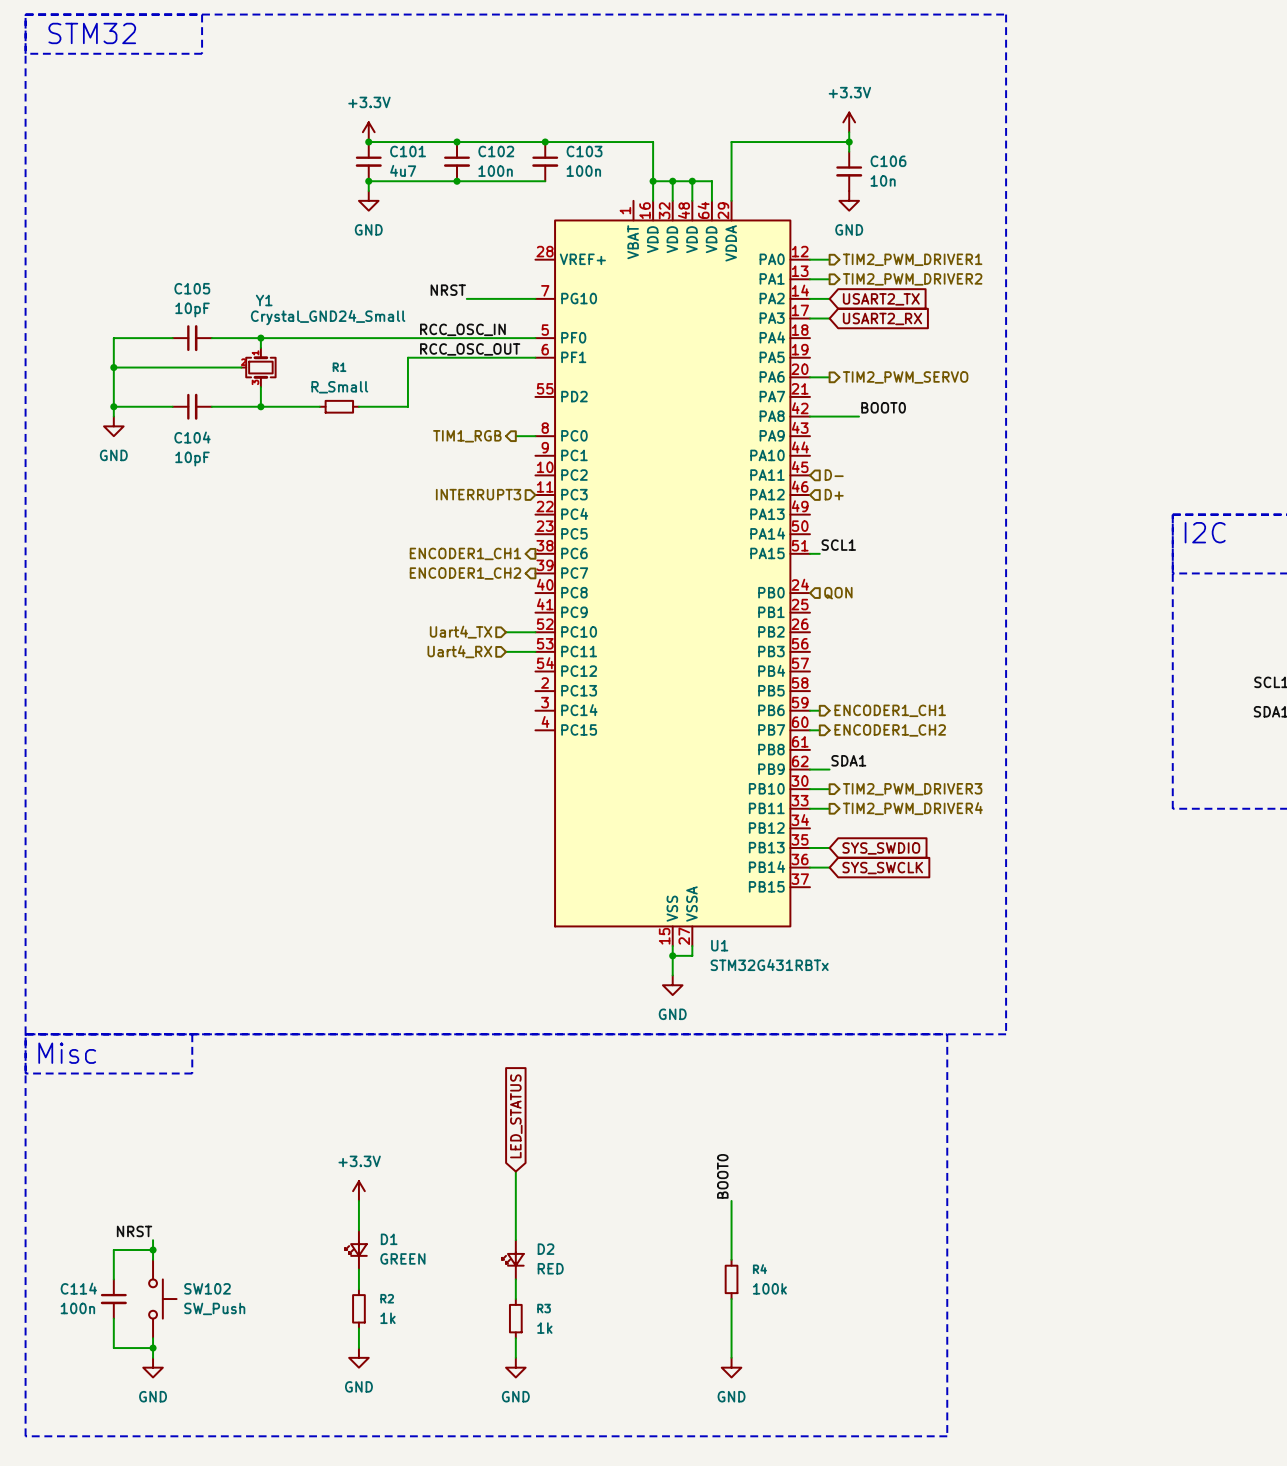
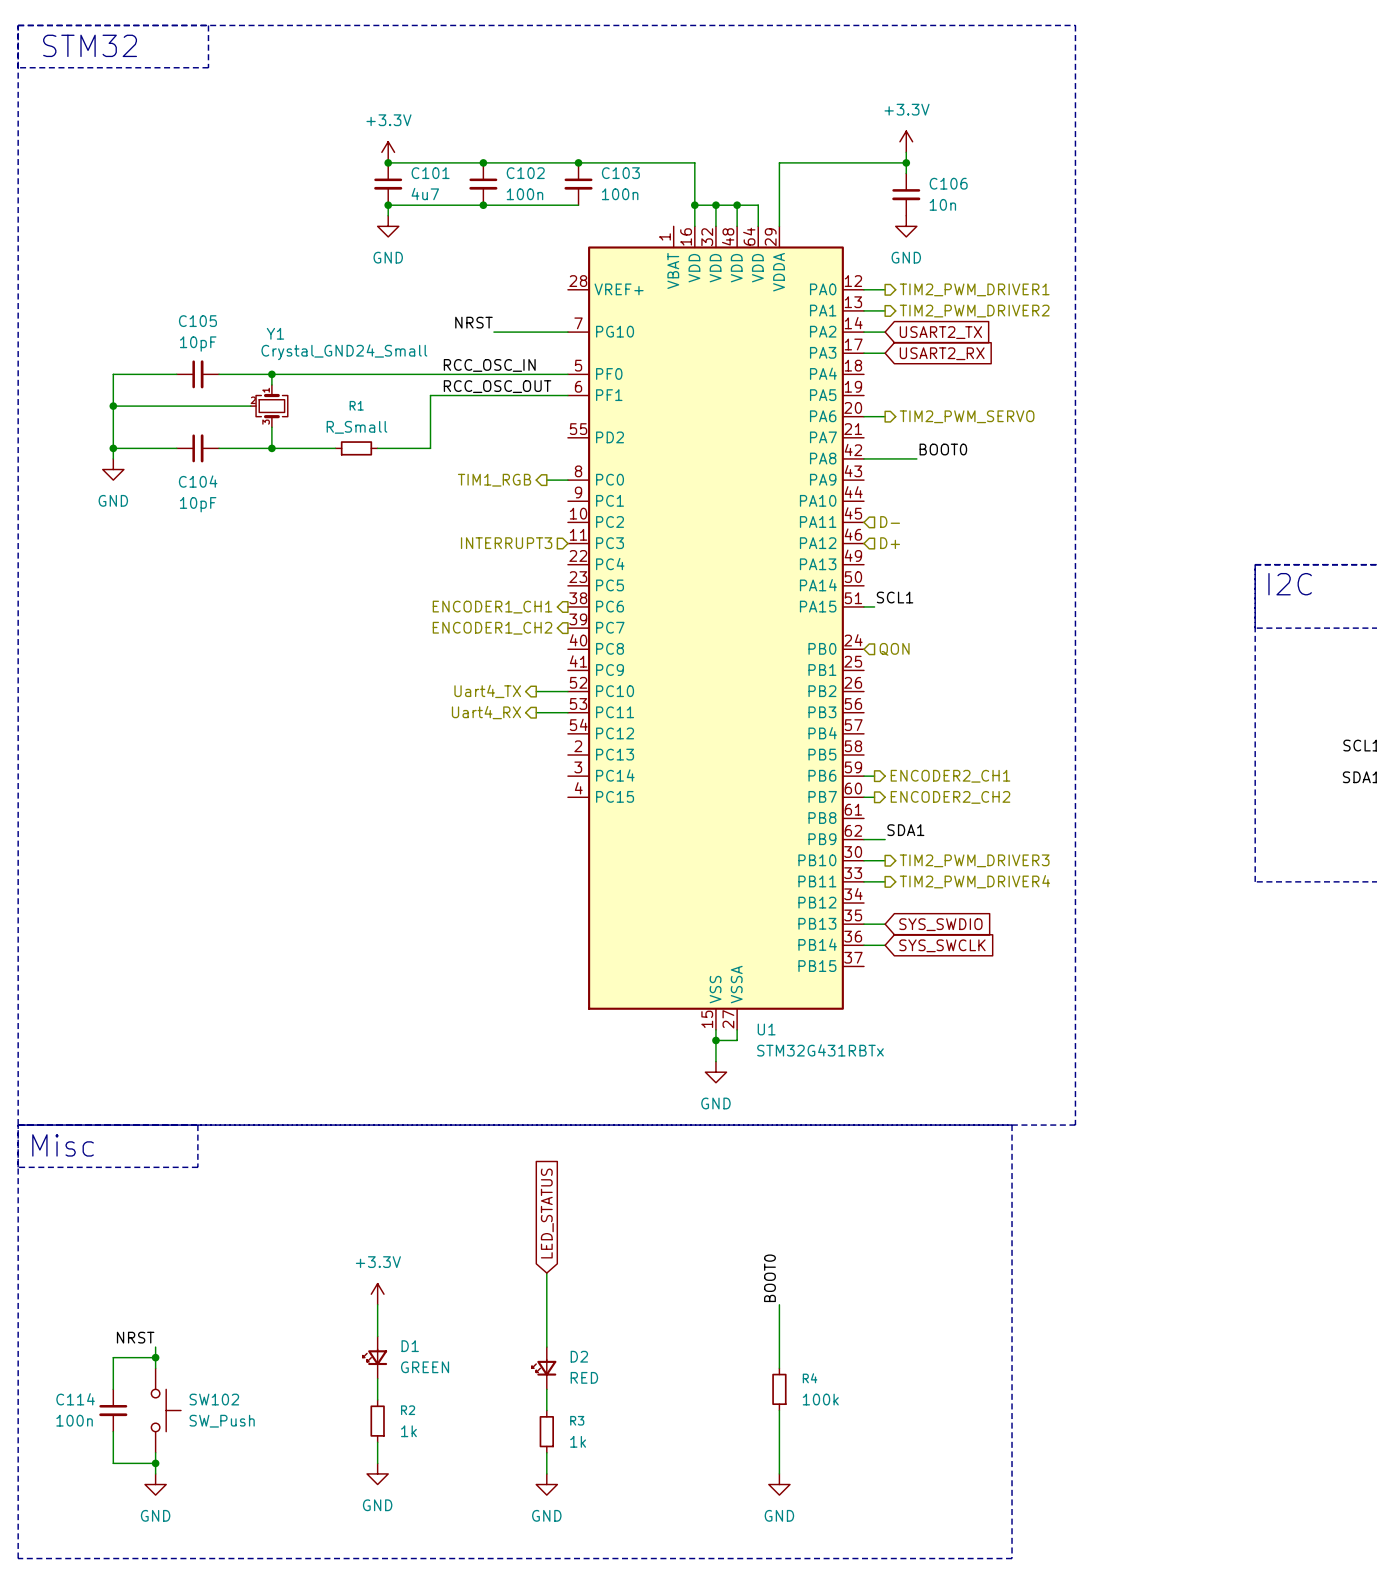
hierarchical label shape: input (461, 632) -> output (487, 691)
hierarchical label shape: input (459, 651) -> output (486, 712)
hierarchical label: ENCODER1_CH1 (890, 710) -> ENCODER2_CH1 (950, 776)
hierarchical label: ENCODER1_CH2 (890, 730) -> ENCODER2_CH2 (950, 797)

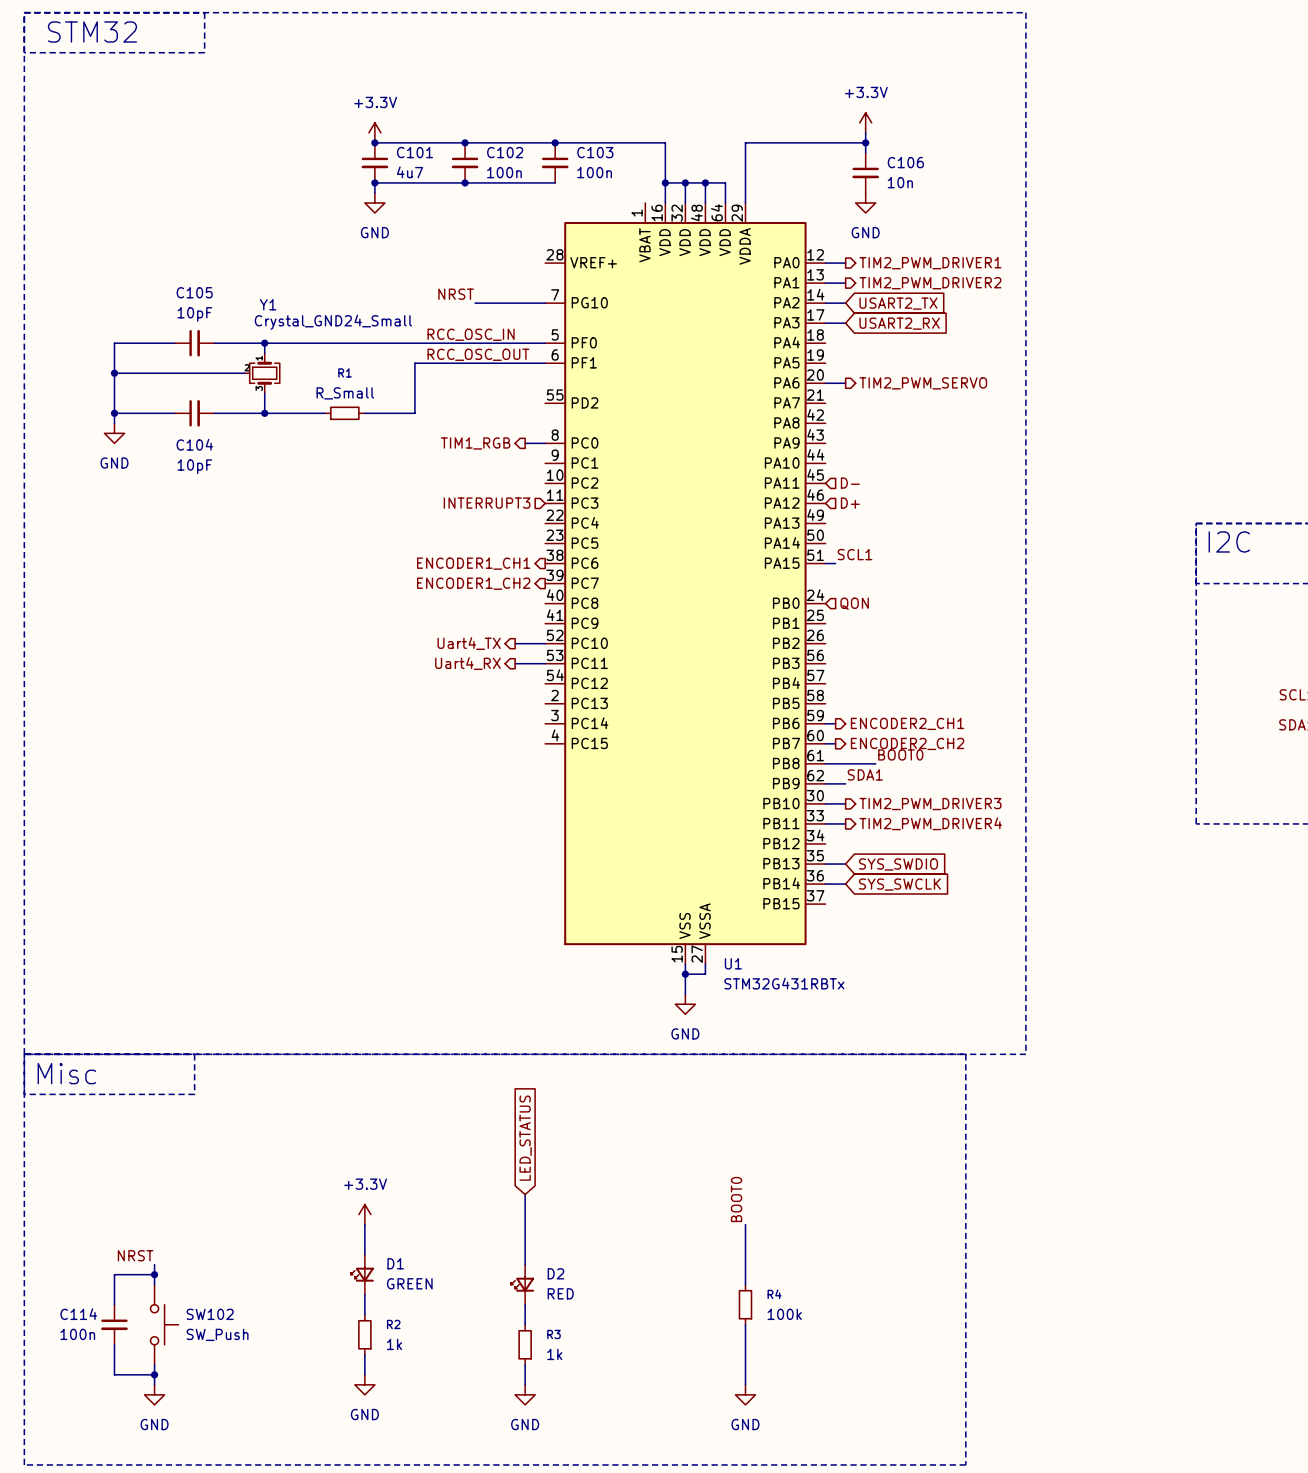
label: BOOT0 (943, 449) -> none
wire: (863, 458) (916, 458) -> none
label: none -> BOOT0 (900, 754)
wire: none -> (825, 763) (875, 763)

